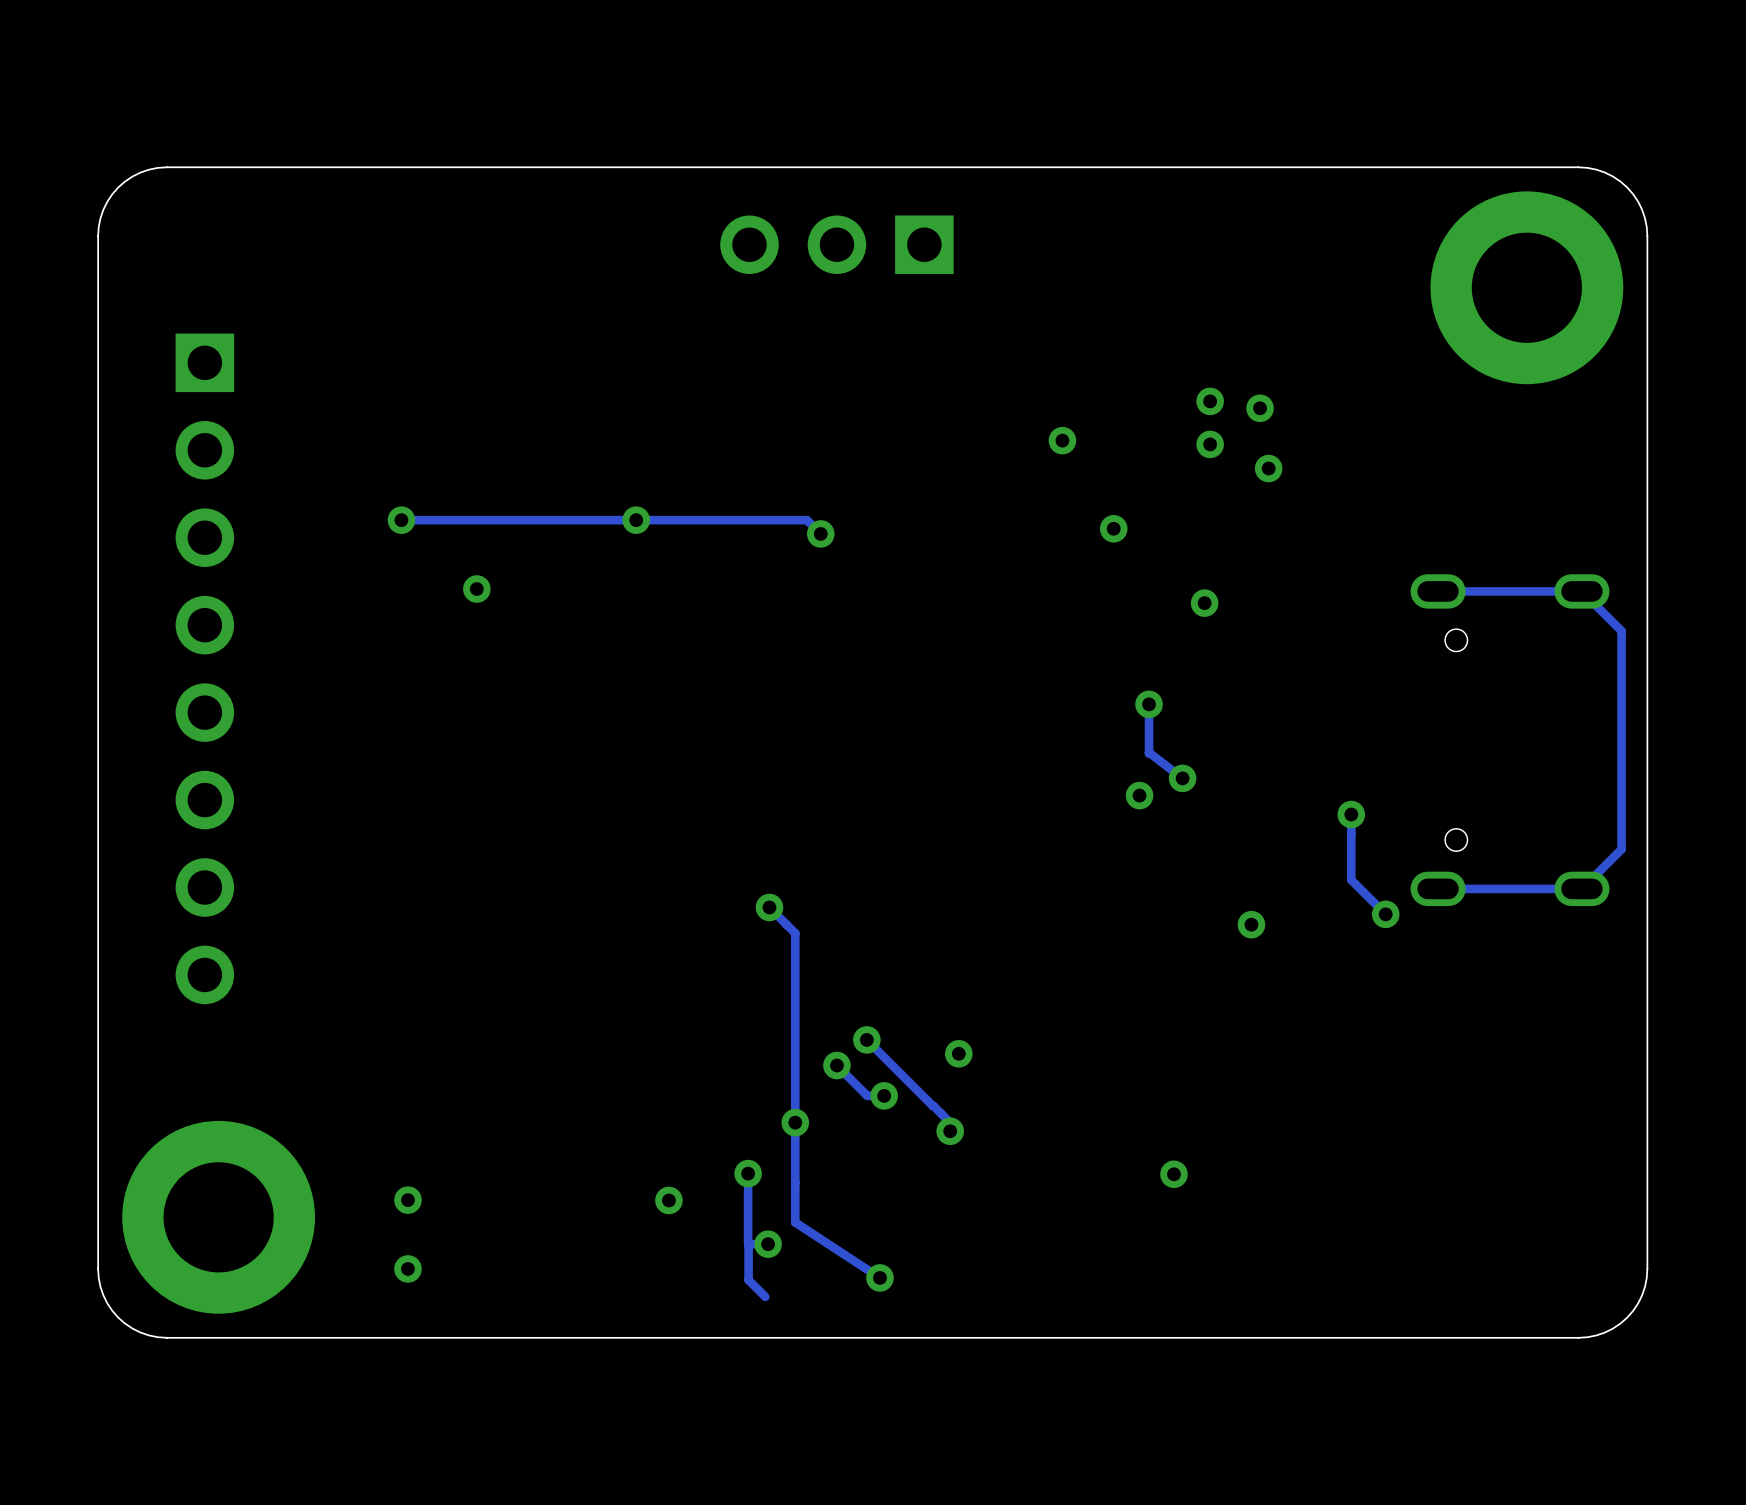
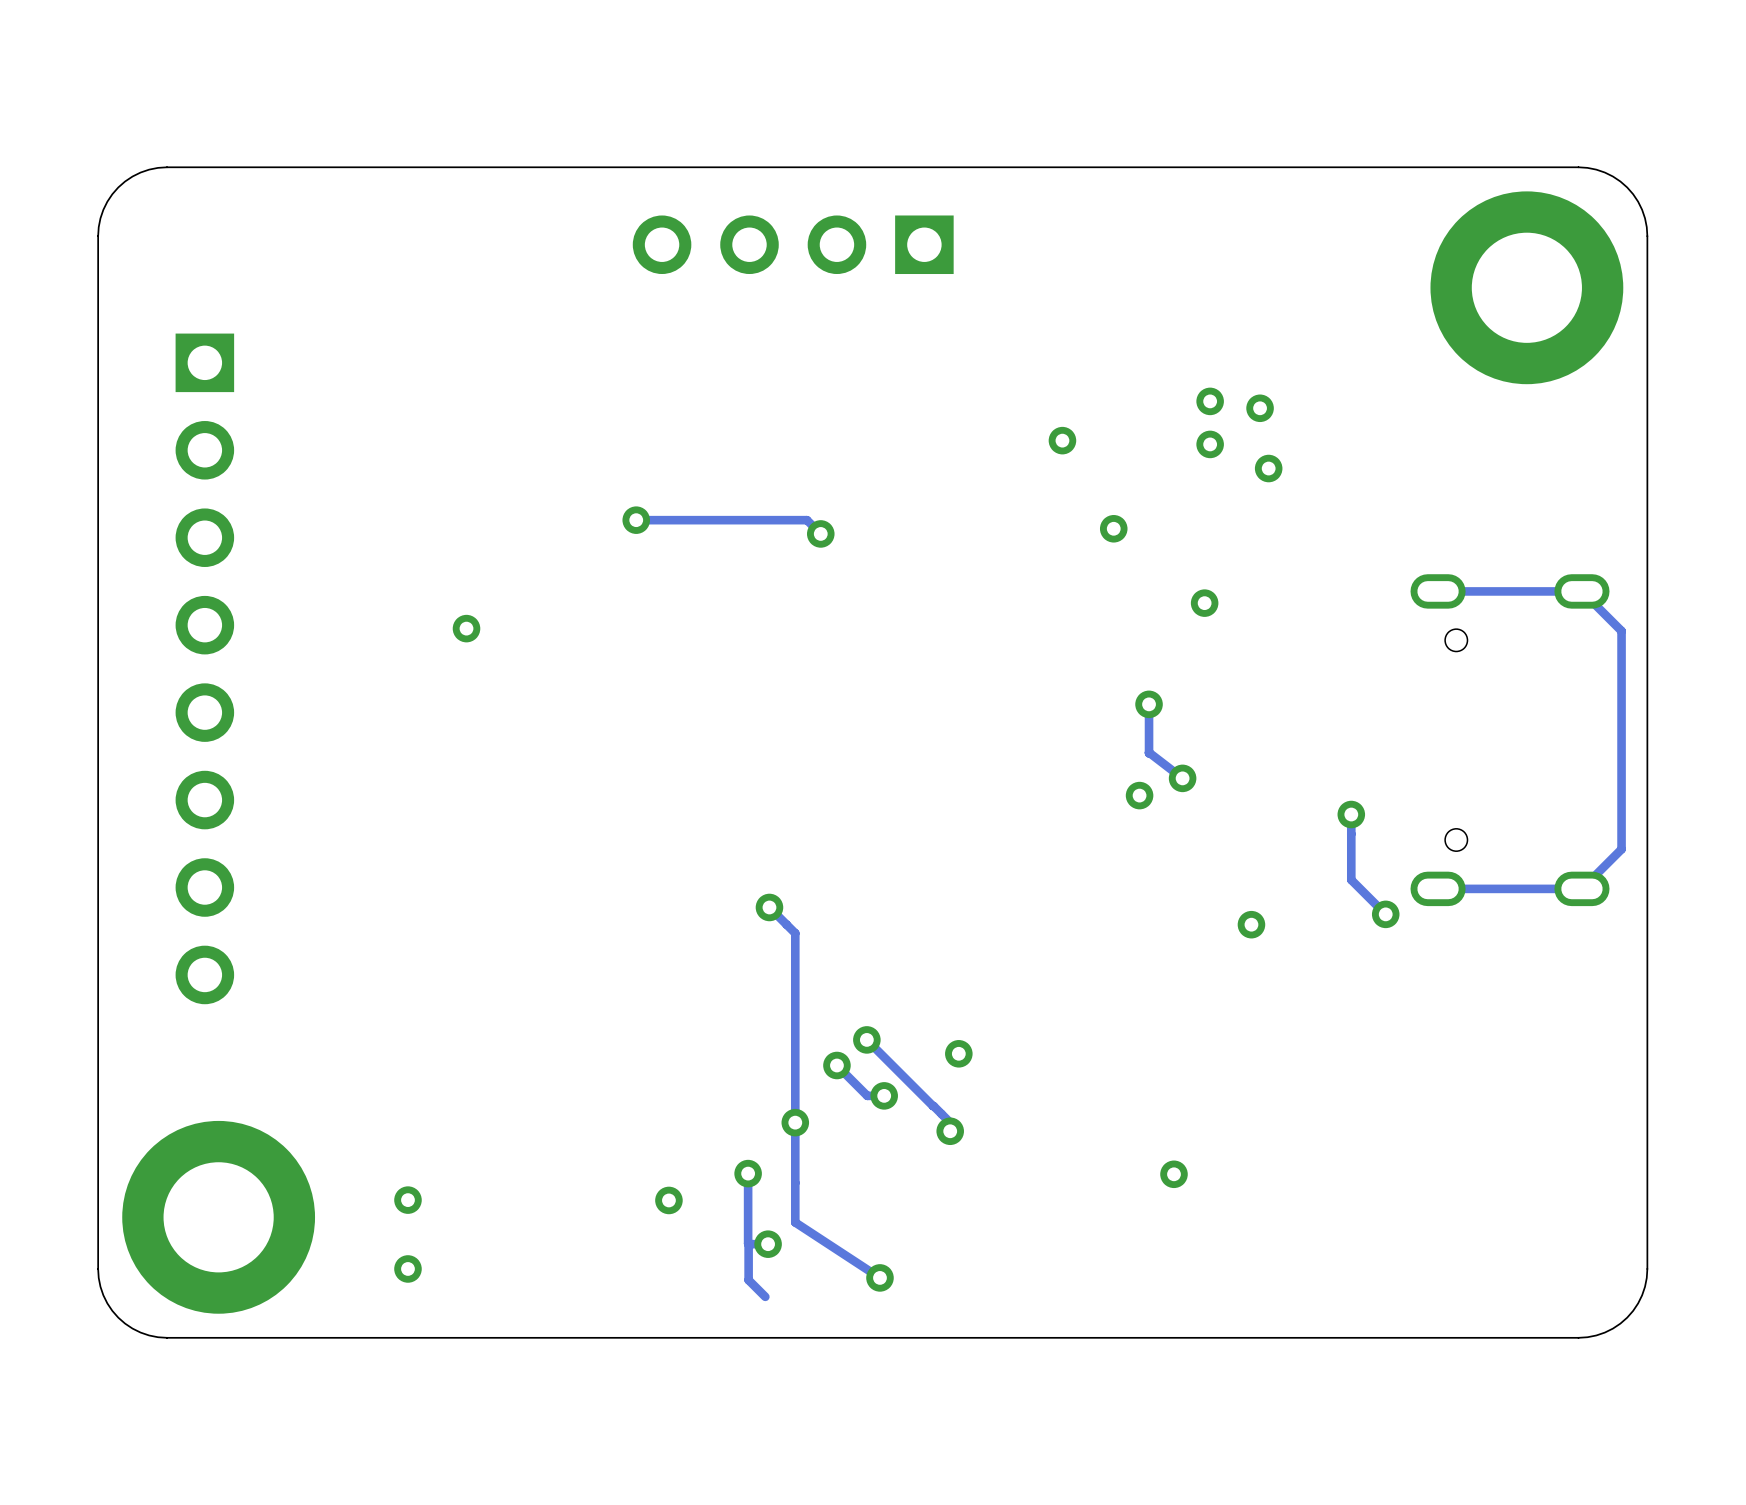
part: none -> (793, 244)
via: (401, 520) -> none
track: (636, 520) (401, 520) -> none
via position: (476, 589) -> (466, 628)

